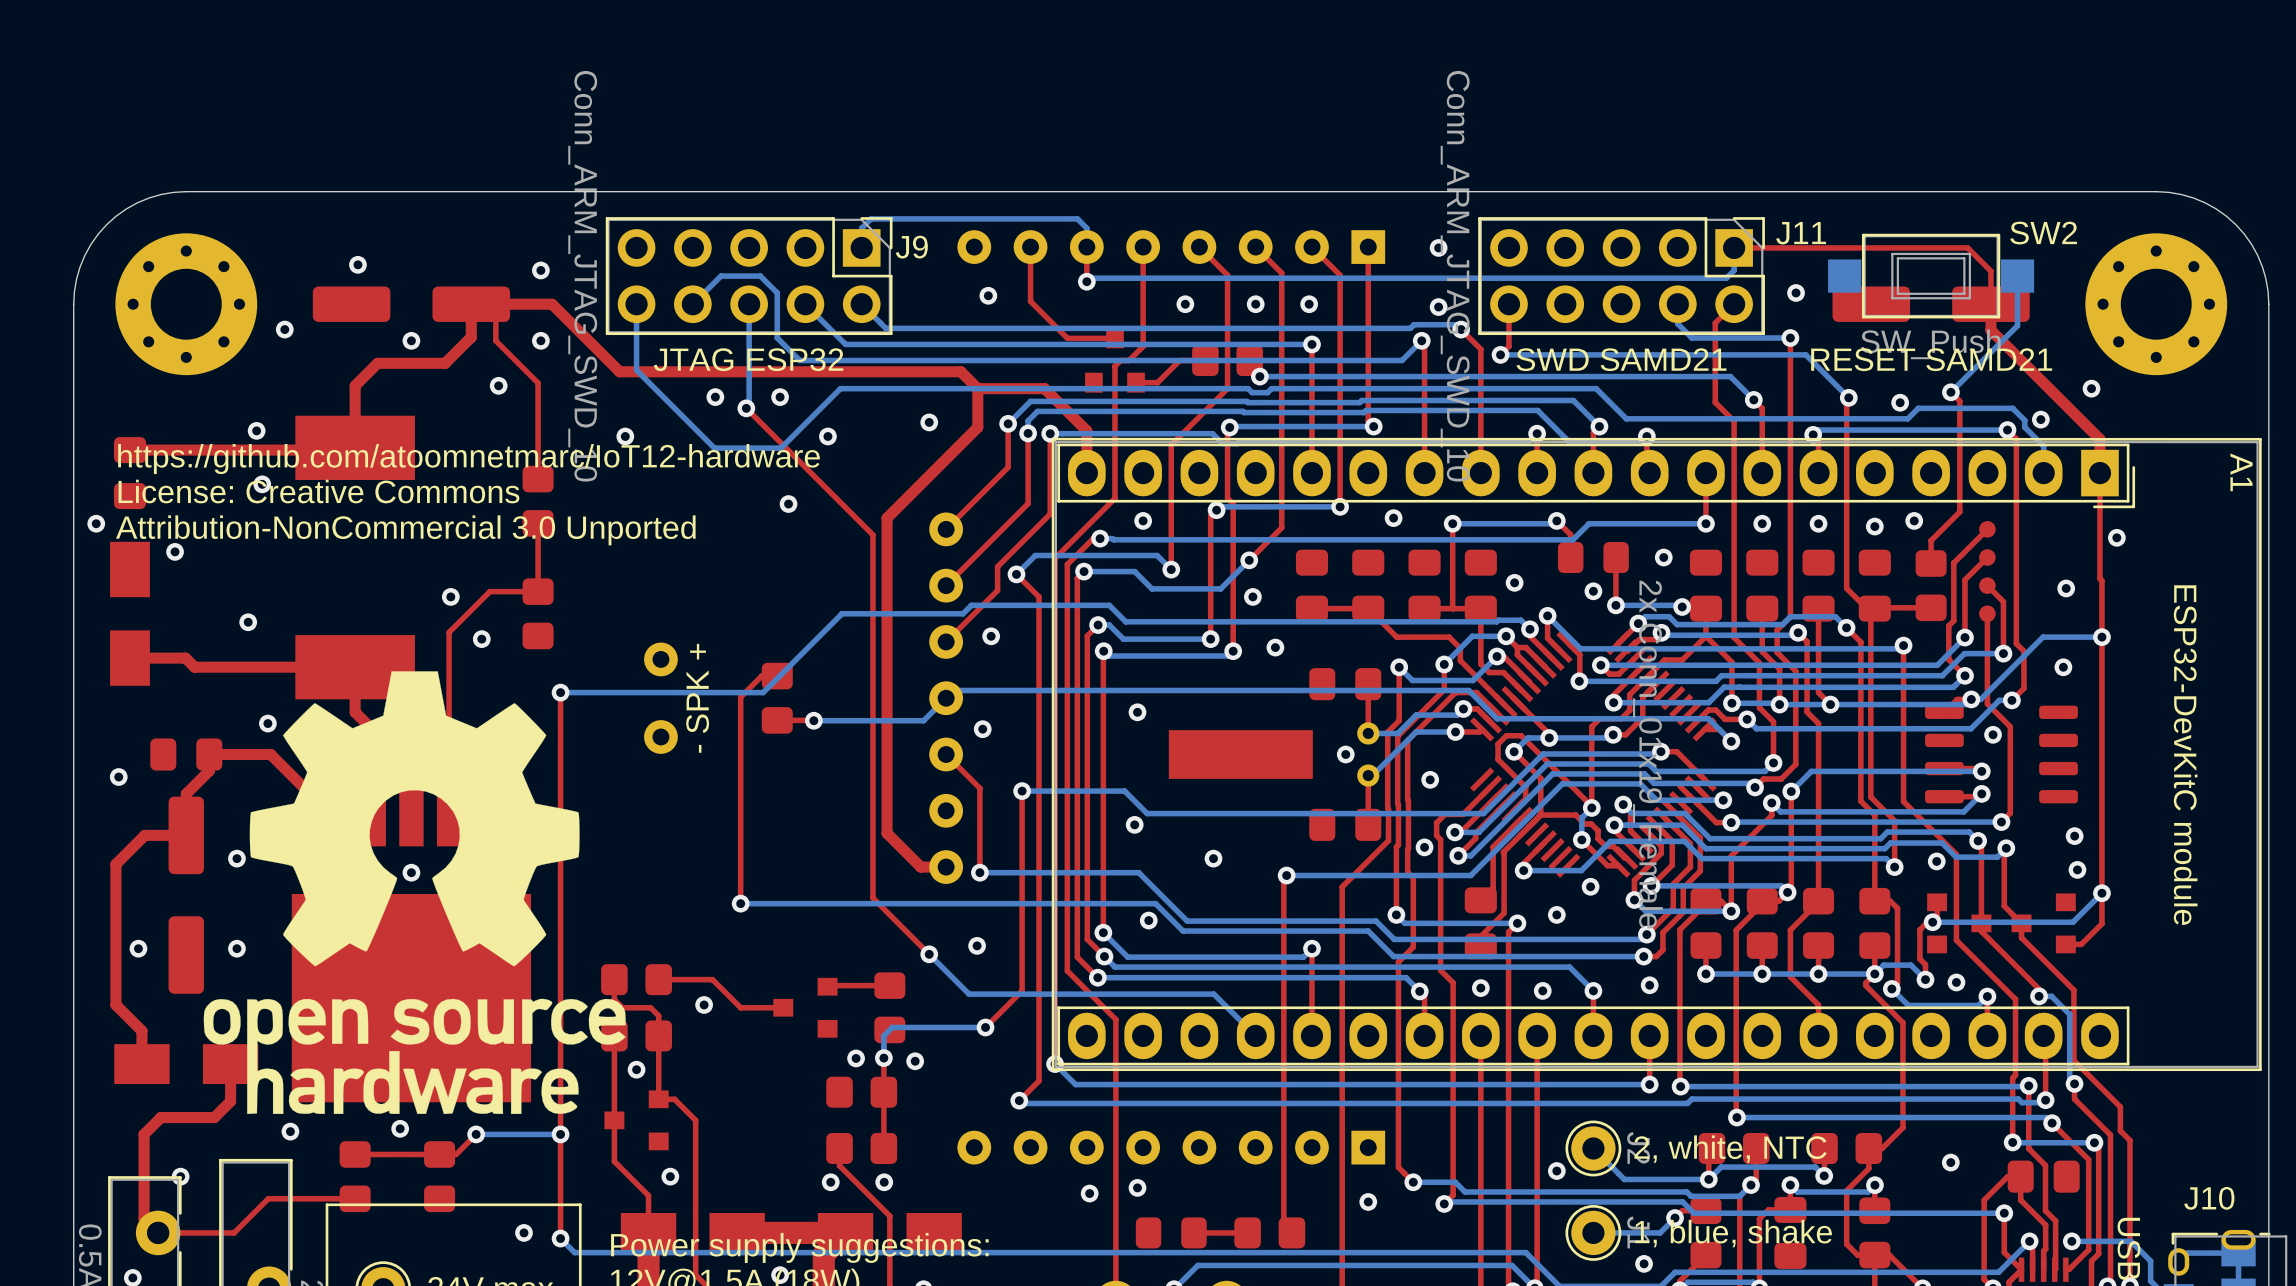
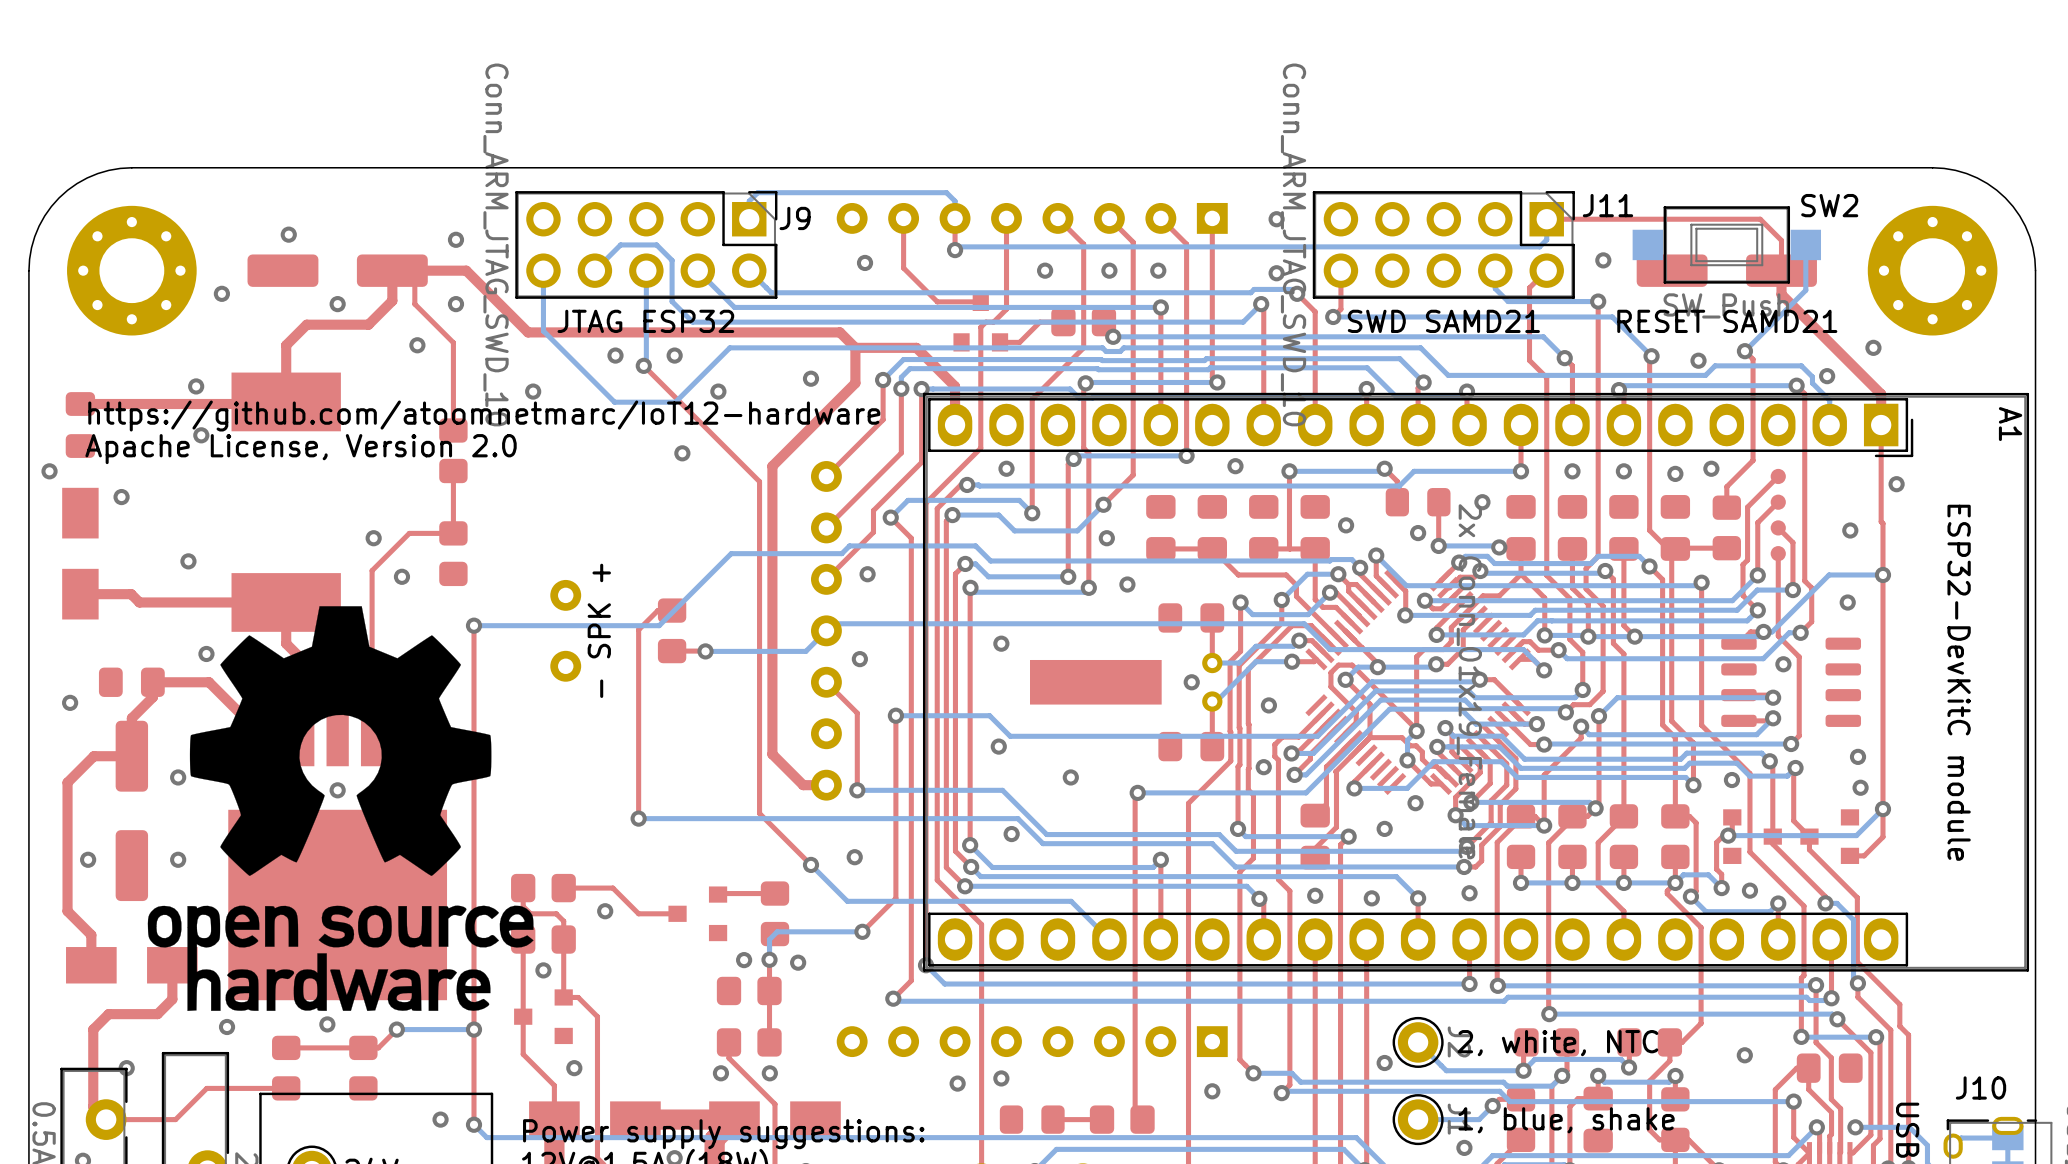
text position: https://github.com/atoomnetmarc/IoT12-hardware (469, 459) -> https://github.com/atoomnetmarc/IoT12-hardware (484, 416)
text: License: Creative Commons (318, 491) -> Apache License, Version 2.0 (301, 449)
text: Attribution-NonCommercial 3.0 Unported (405, 530) -> none

